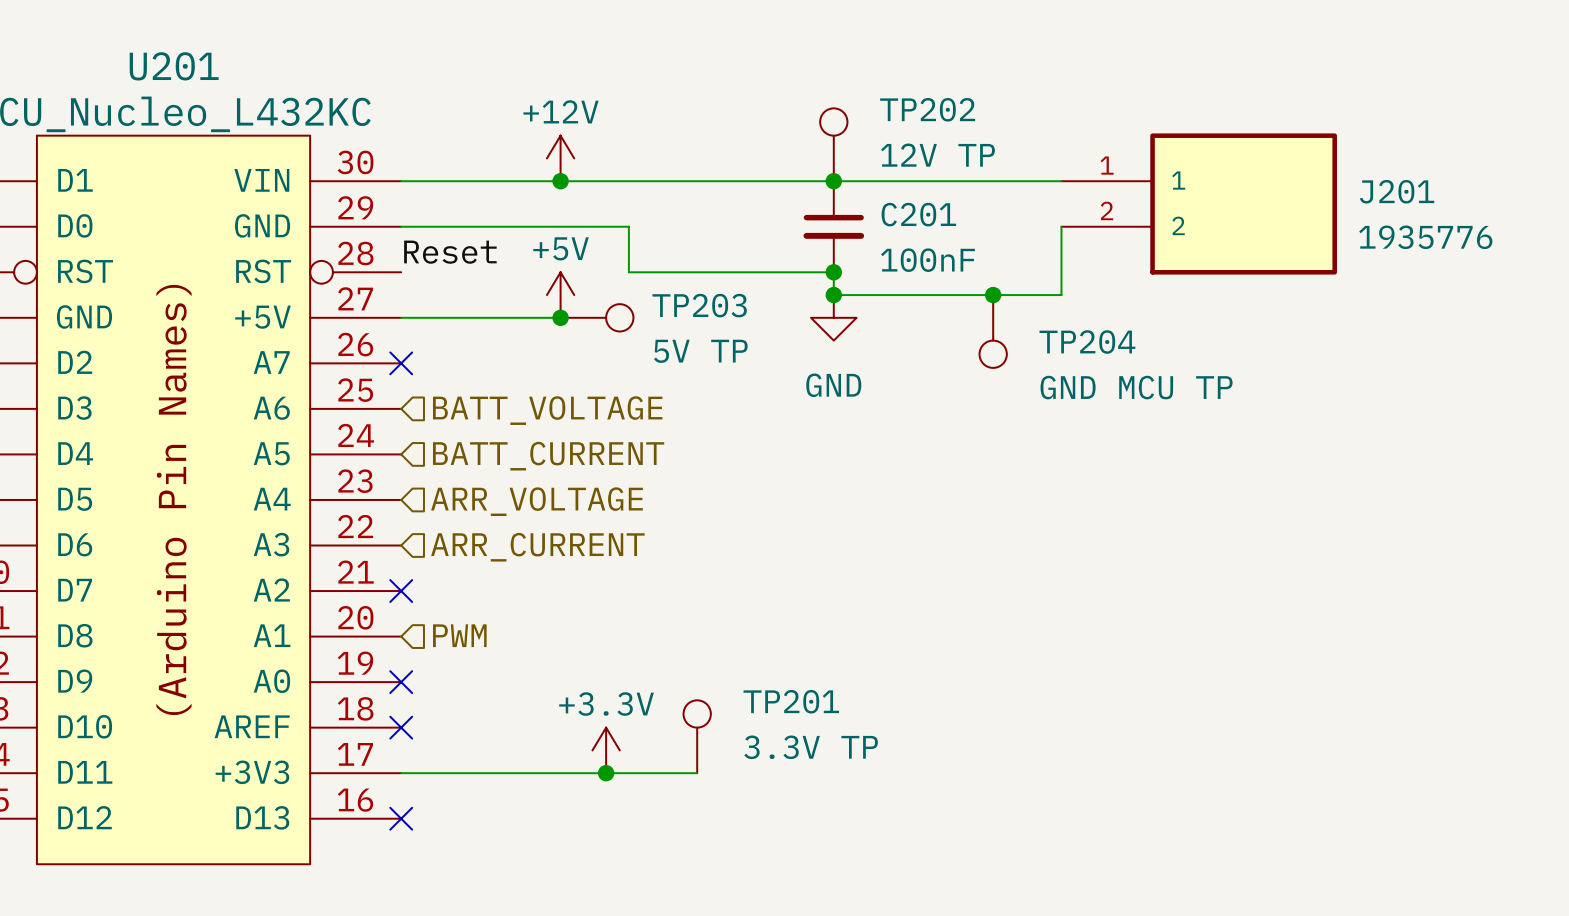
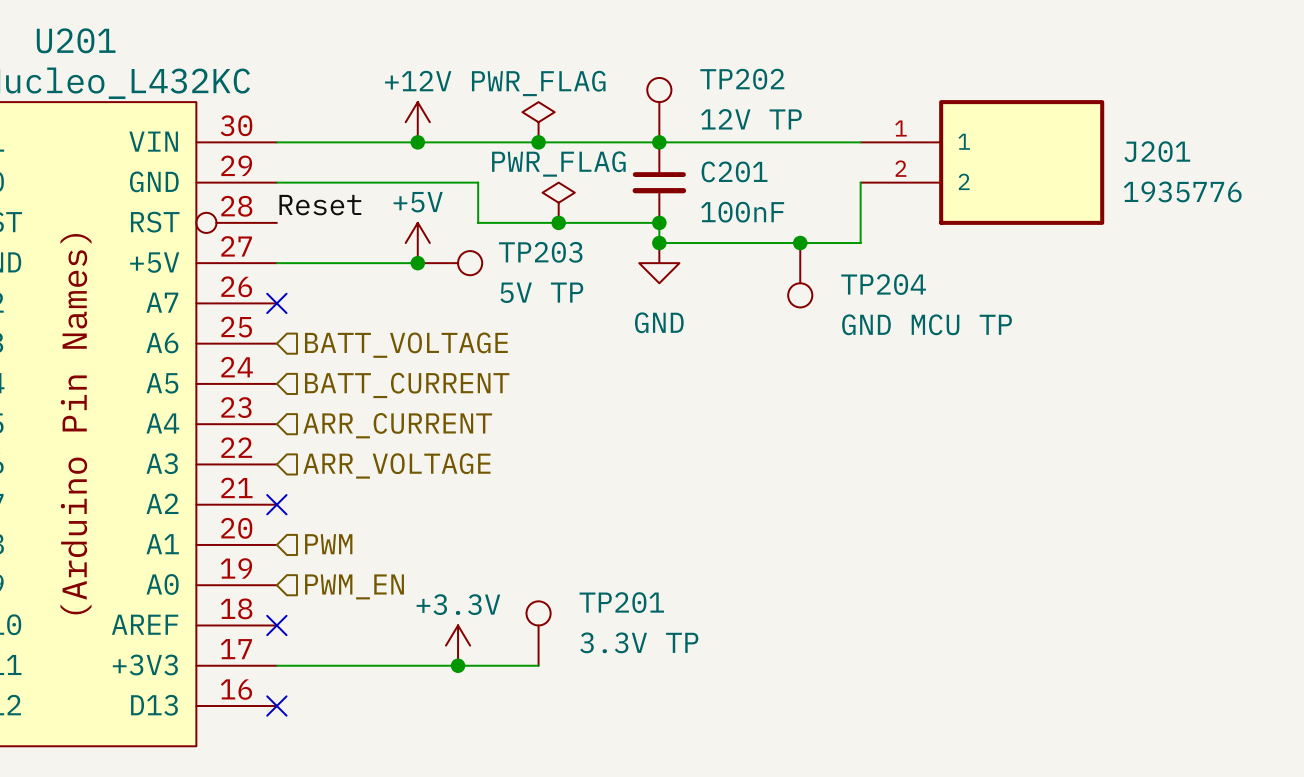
power symbol: none -> PWR_FLAG (538, 122)
junction: none -> (538, 142)
power symbol: none -> PWR_FLAG (558, 202)
junction: none -> (558, 222)
hierarchical label: ARR_VOLTAGE (536, 501) -> ARR_CURRENT (397, 425)
hierarchical label: ARR_CURRENT (537, 547) -> ARR_VOLTAGE (396, 465)
no-connect mark: (401, 682) -> none
hierarchical label: none -> PWM_EN (354, 586)

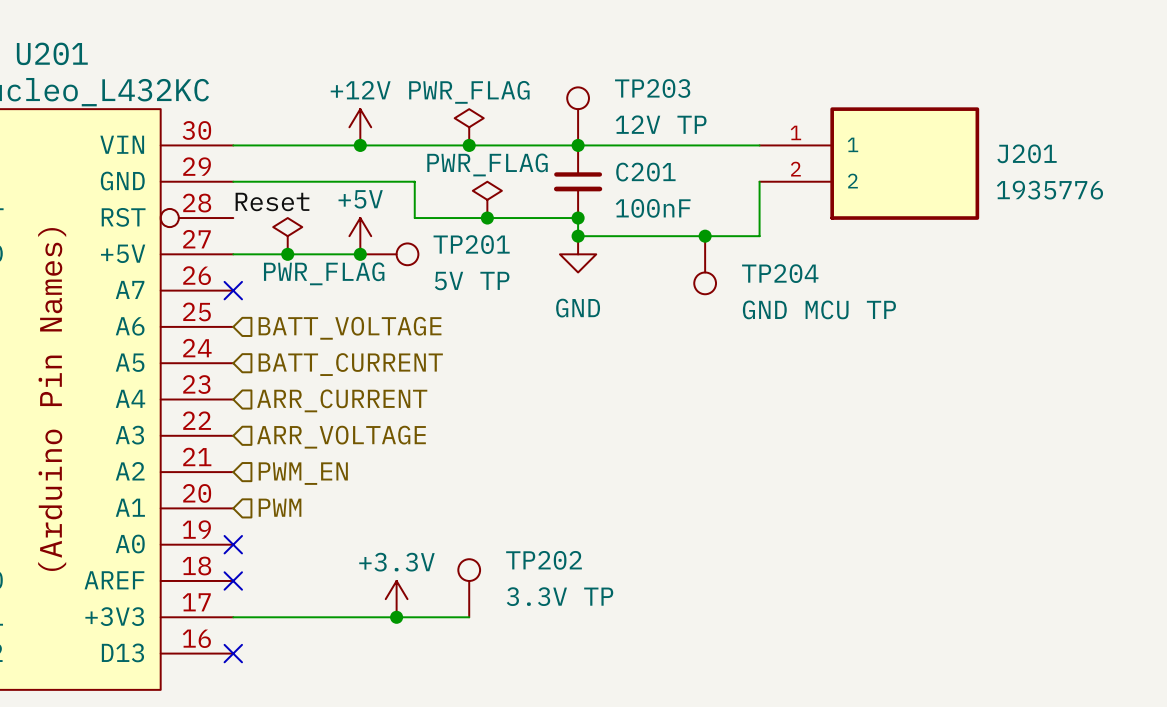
TP202 name: TP202 (742, 79) -> TP203 (652, 88)
power symbol: none -> PWR_FLAG (287, 236)
TP203 name: TP203 (540, 252) -> TP201 (471, 244)
junction: none -> (287, 254)
no-connect mark position: (276, 504) -> (233, 544)
hierarchical label position: PWM_EN (354, 586) -> PWM_EN (303, 473)
TP201 name: TP201 (621, 602) -> TP202 (544, 560)

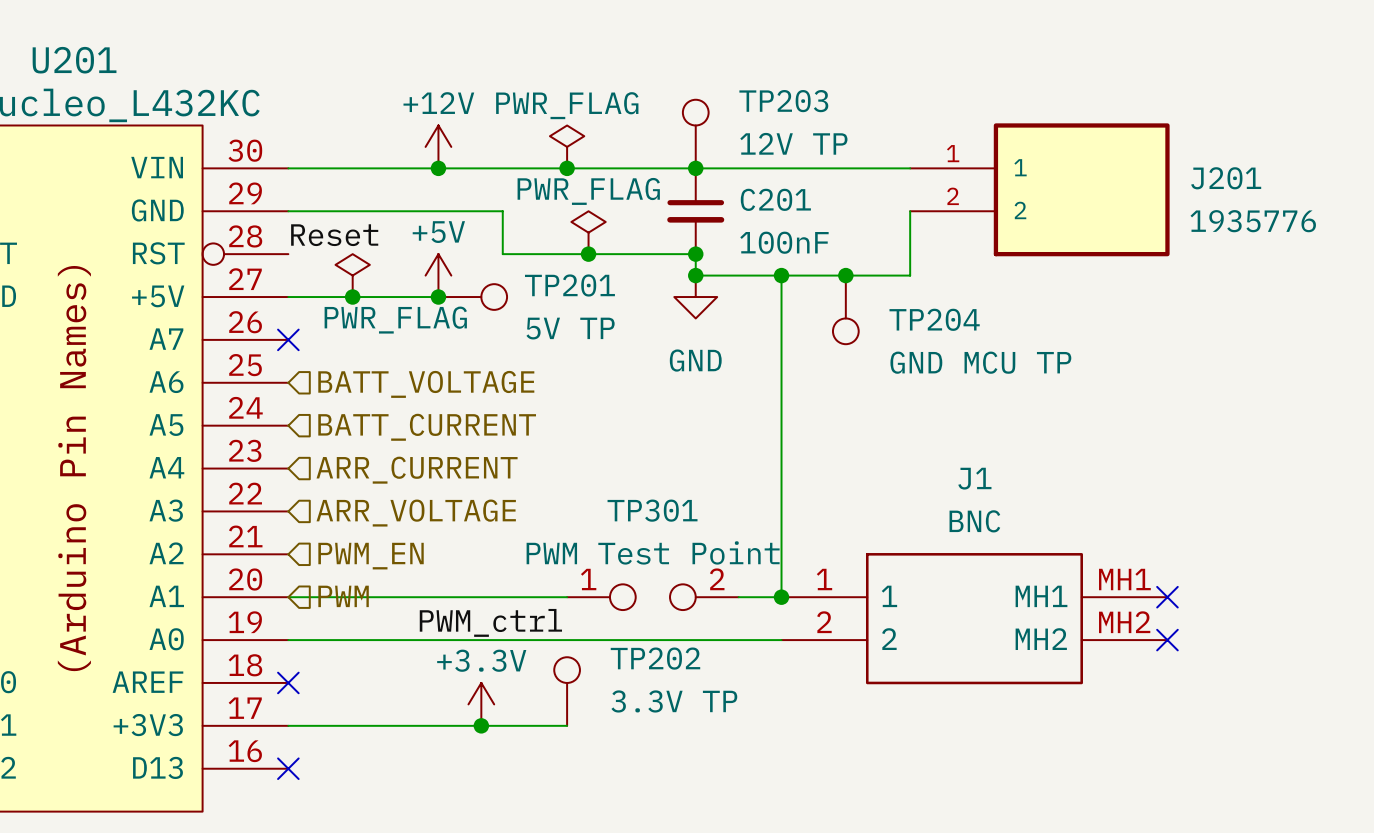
wire: none -> (781, 275) (781, 597) (738, 597)
junction: none -> (781, 275)
wire: none -> (288, 597) (567, 597)
TP301: none -> PWM Test Point (652, 597)
junction: none -> (781, 597)
no-connect mark: none -> (1167, 597)
J1: none -> BNC (974, 618)
label: none -> PWM_ctrl (490, 622)
wire: none -> (288, 640) (781, 640)
no-connect mark: (233, 544) -> none
no-connect mark: none -> (1167, 640)

